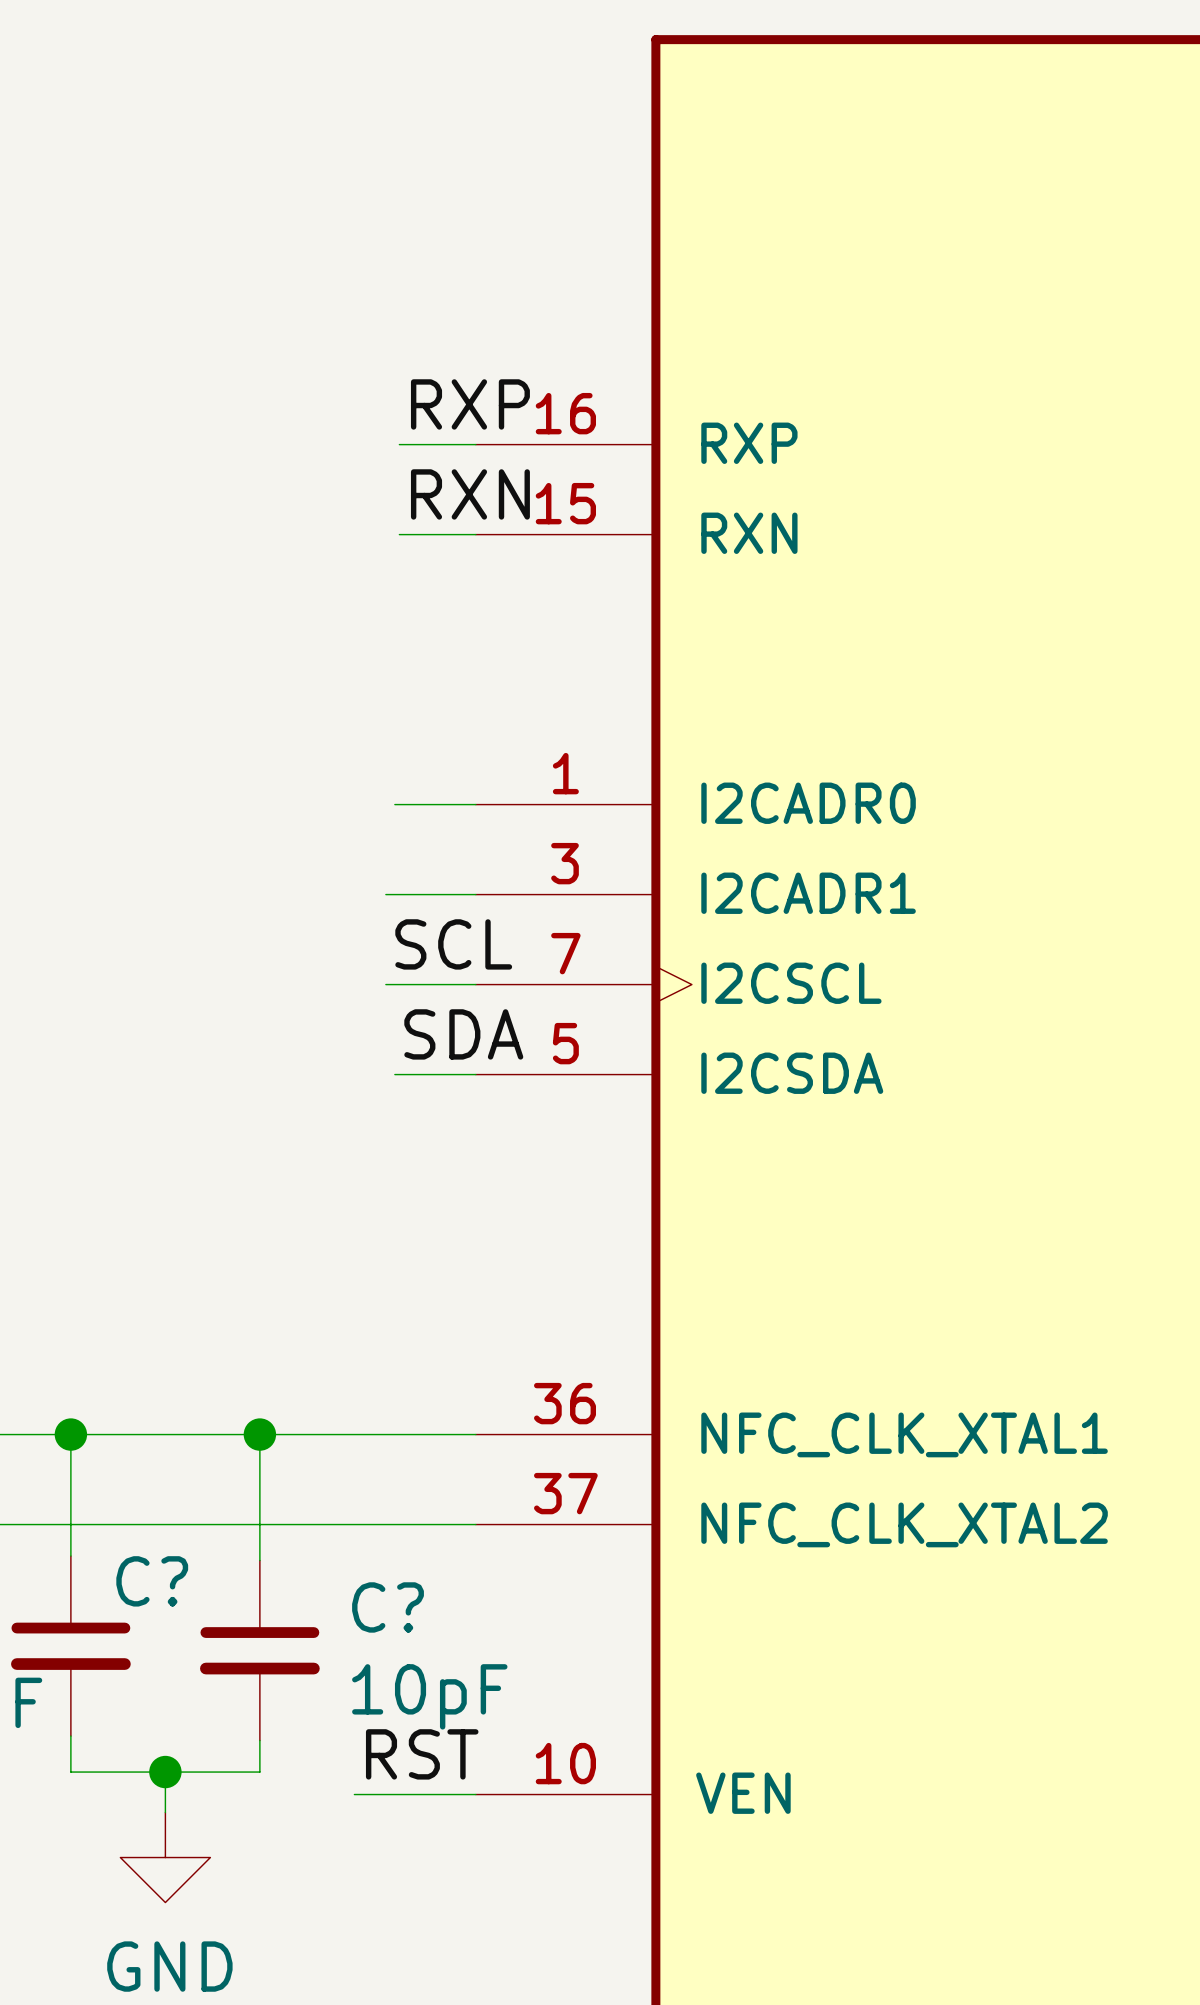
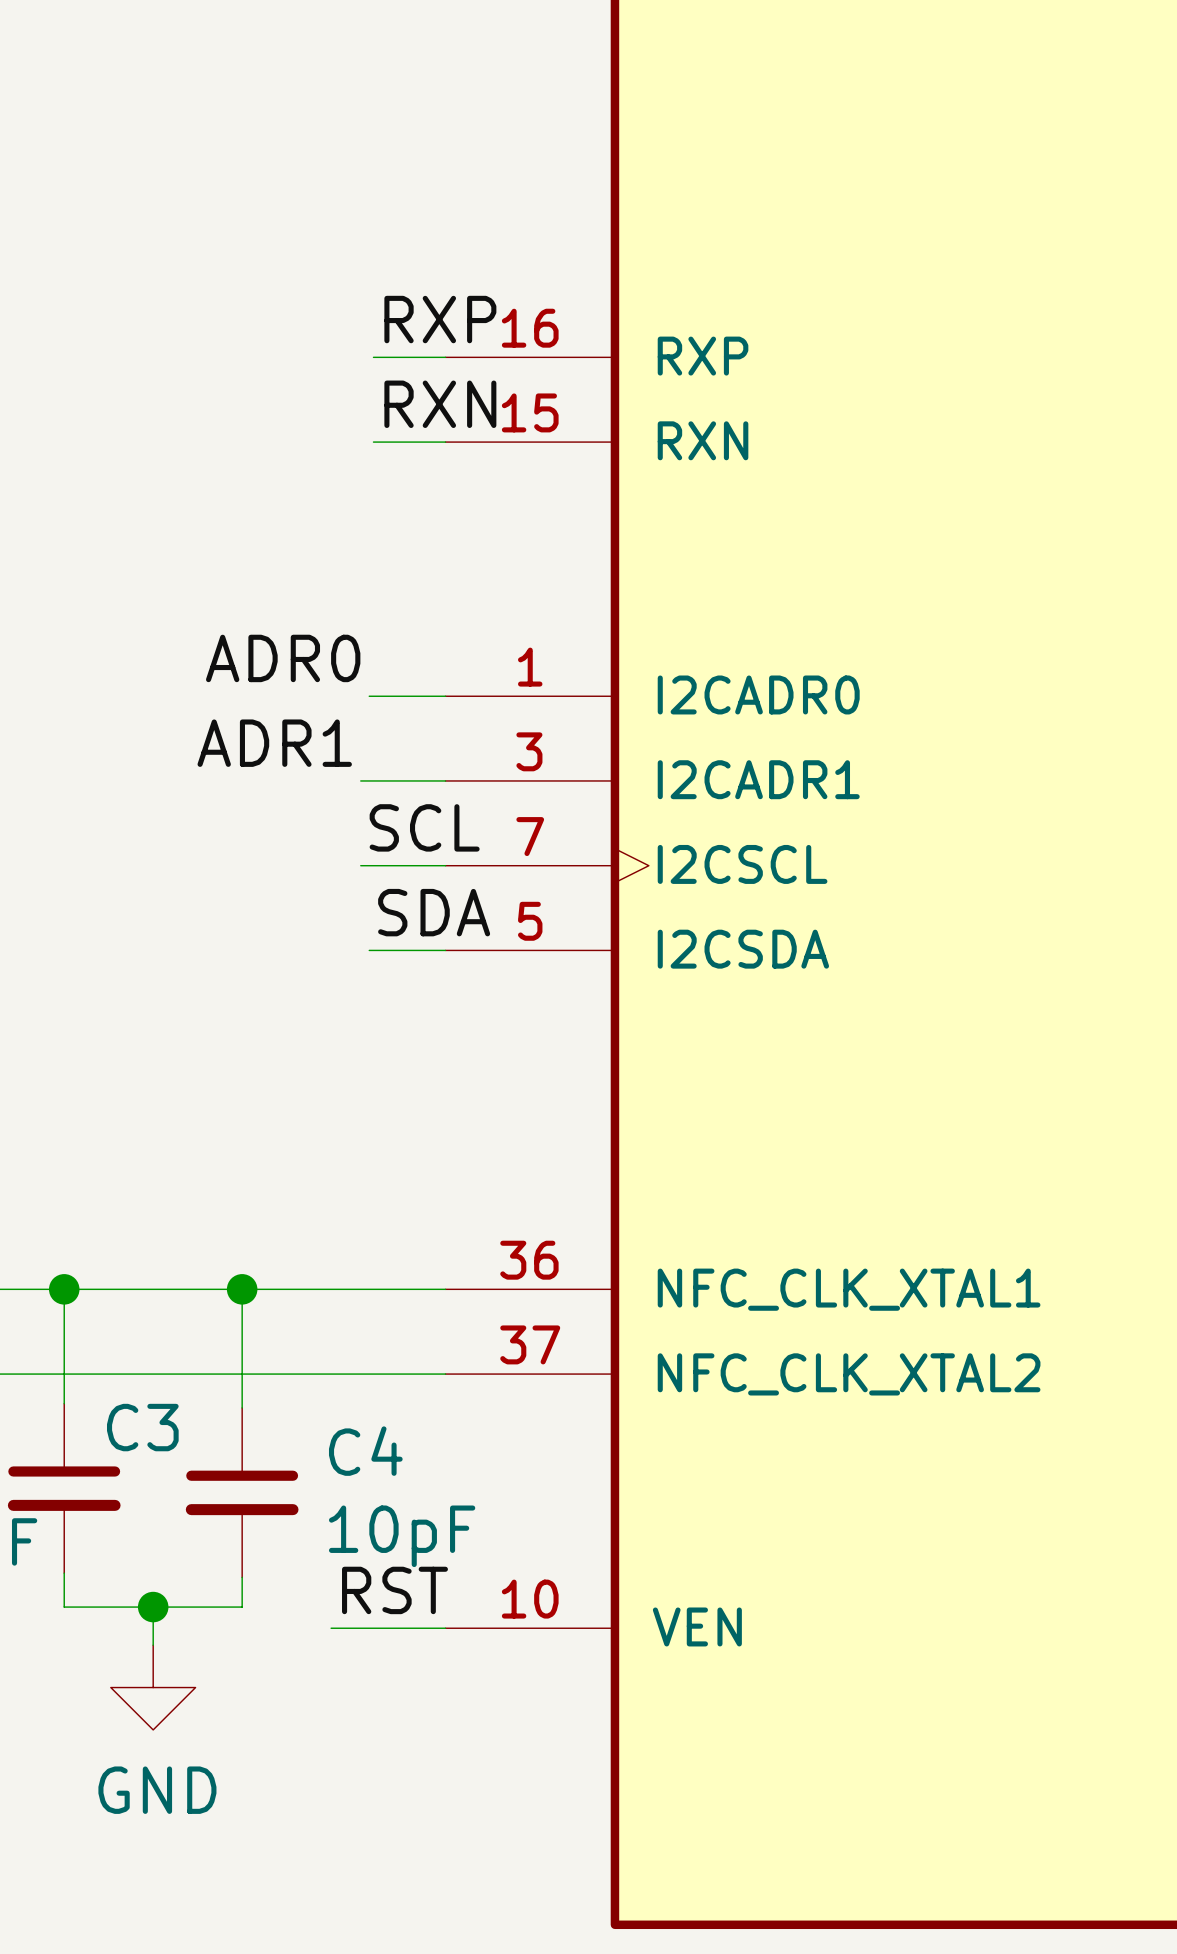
label: none -> ADR0 (283, 658)
label: none -> ADR1 (274, 743)
C? name: C? (152, 1581) -> C3 (142, 1427)
C? name: C? (388, 1607) -> C4 (365, 1451)

